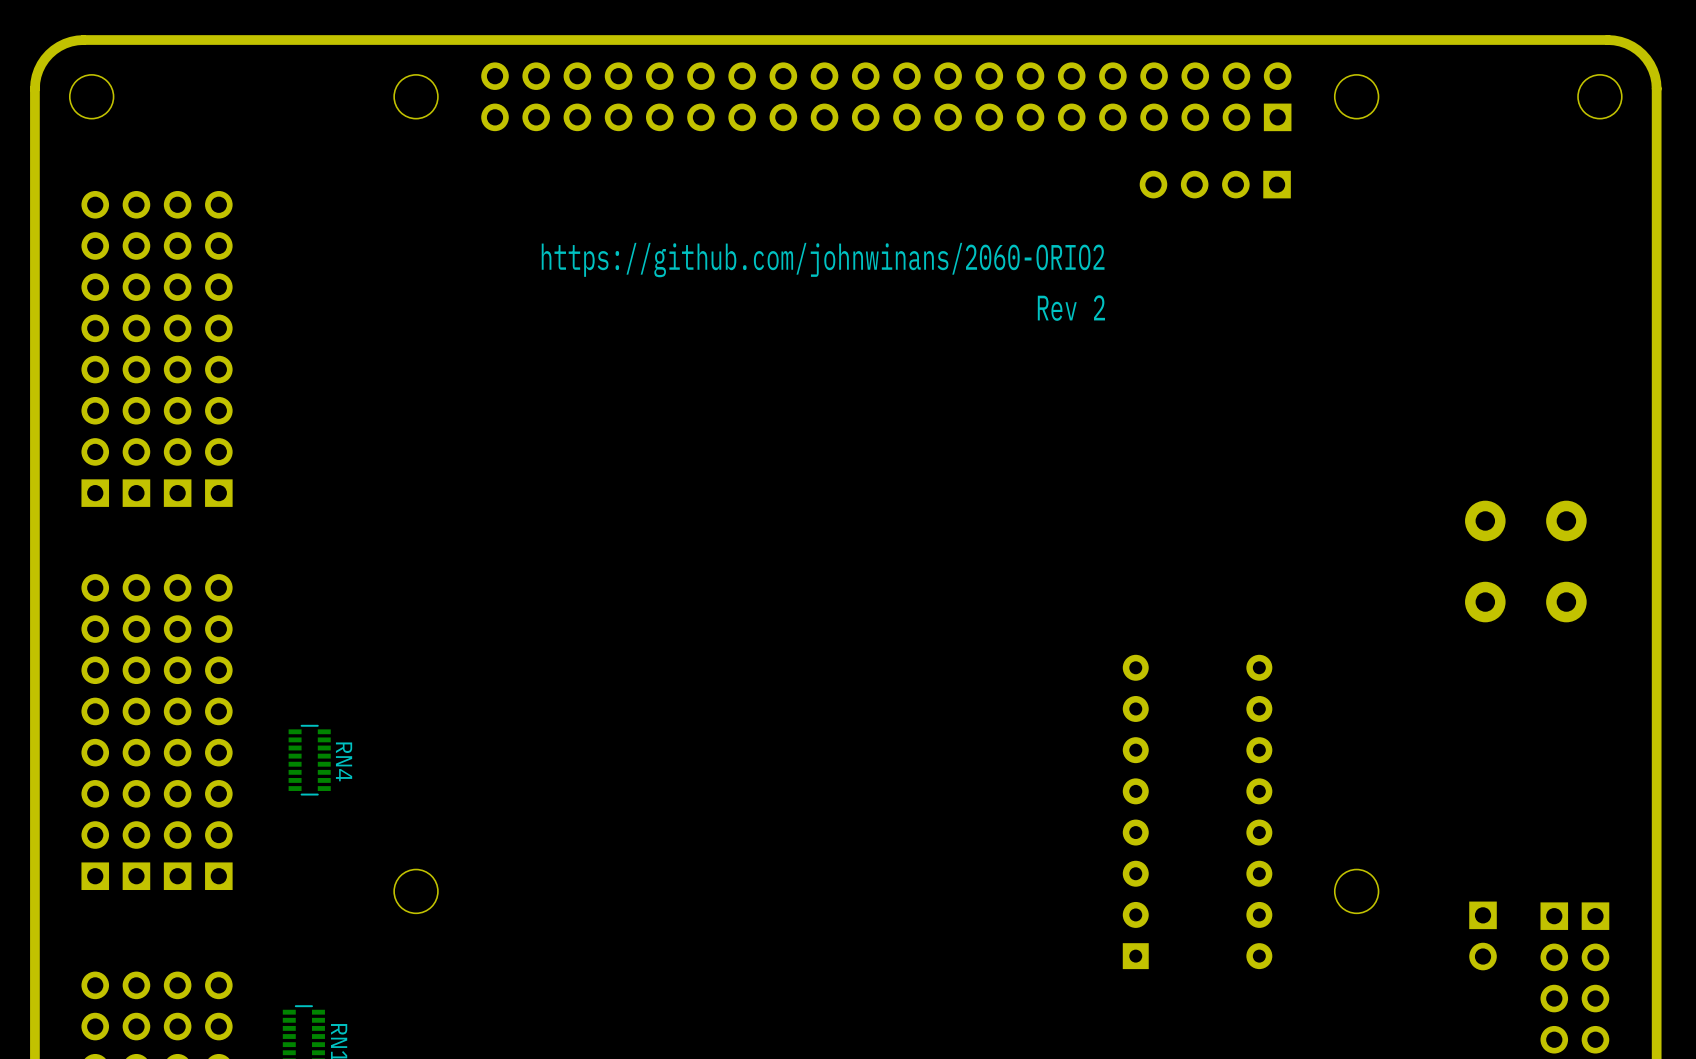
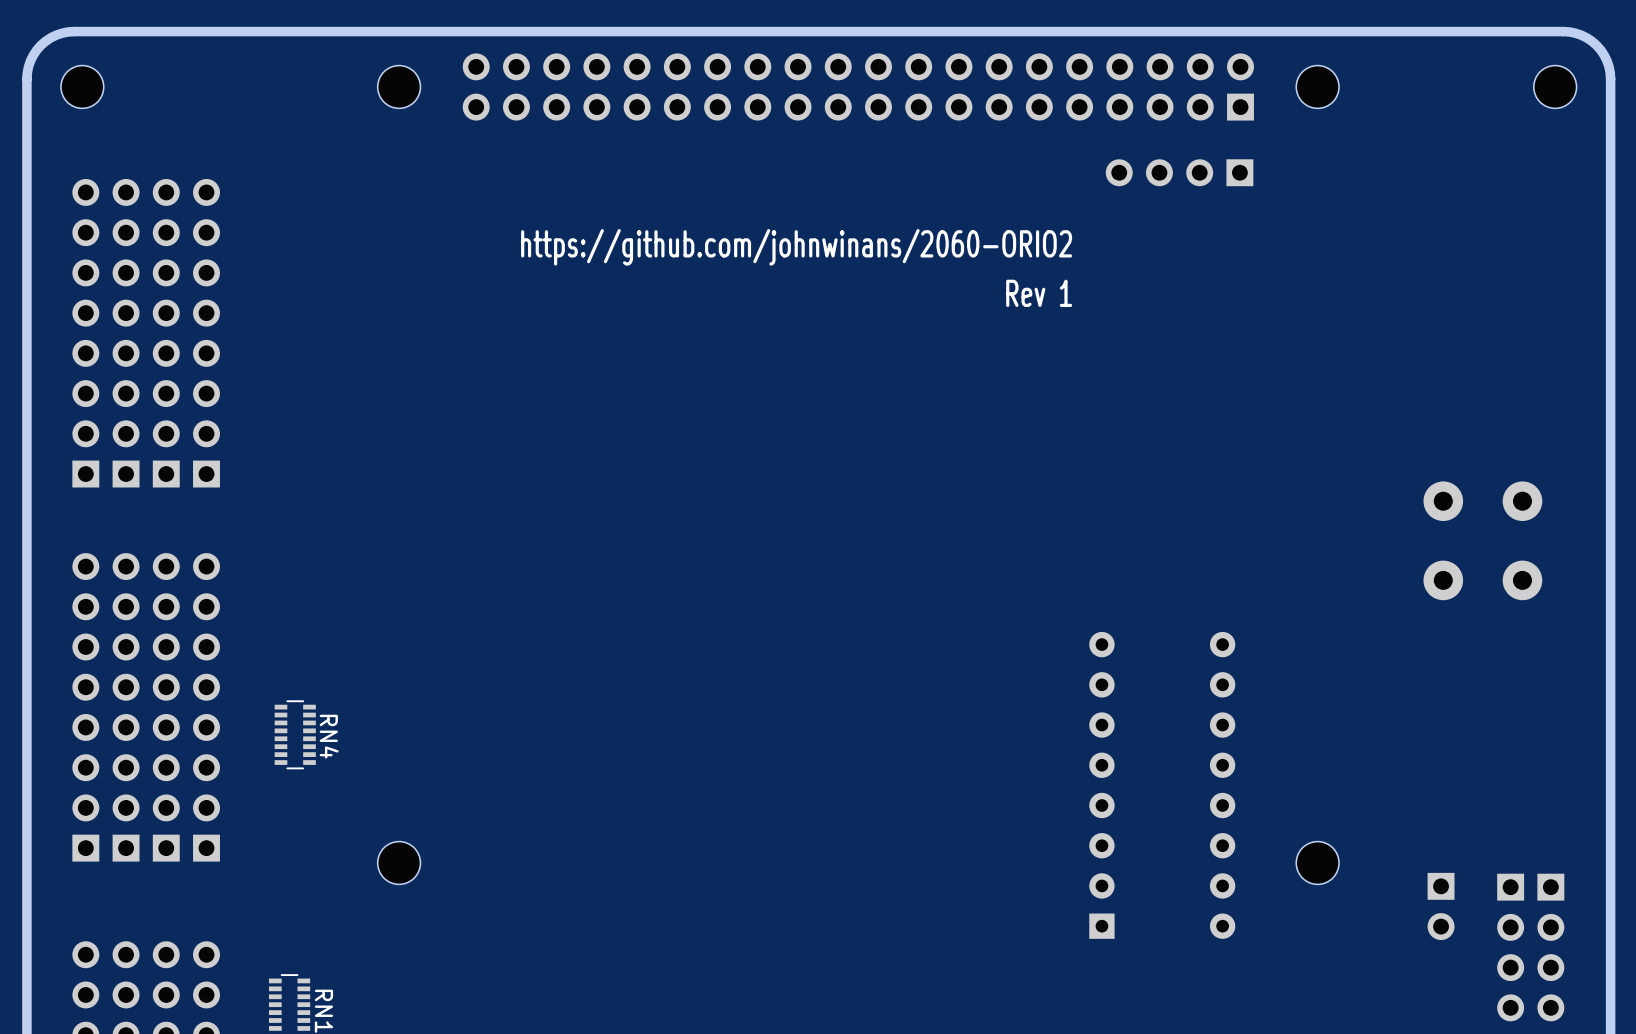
text: Rev 2 (1071, 308) -> Rev 1 (1039, 293)

